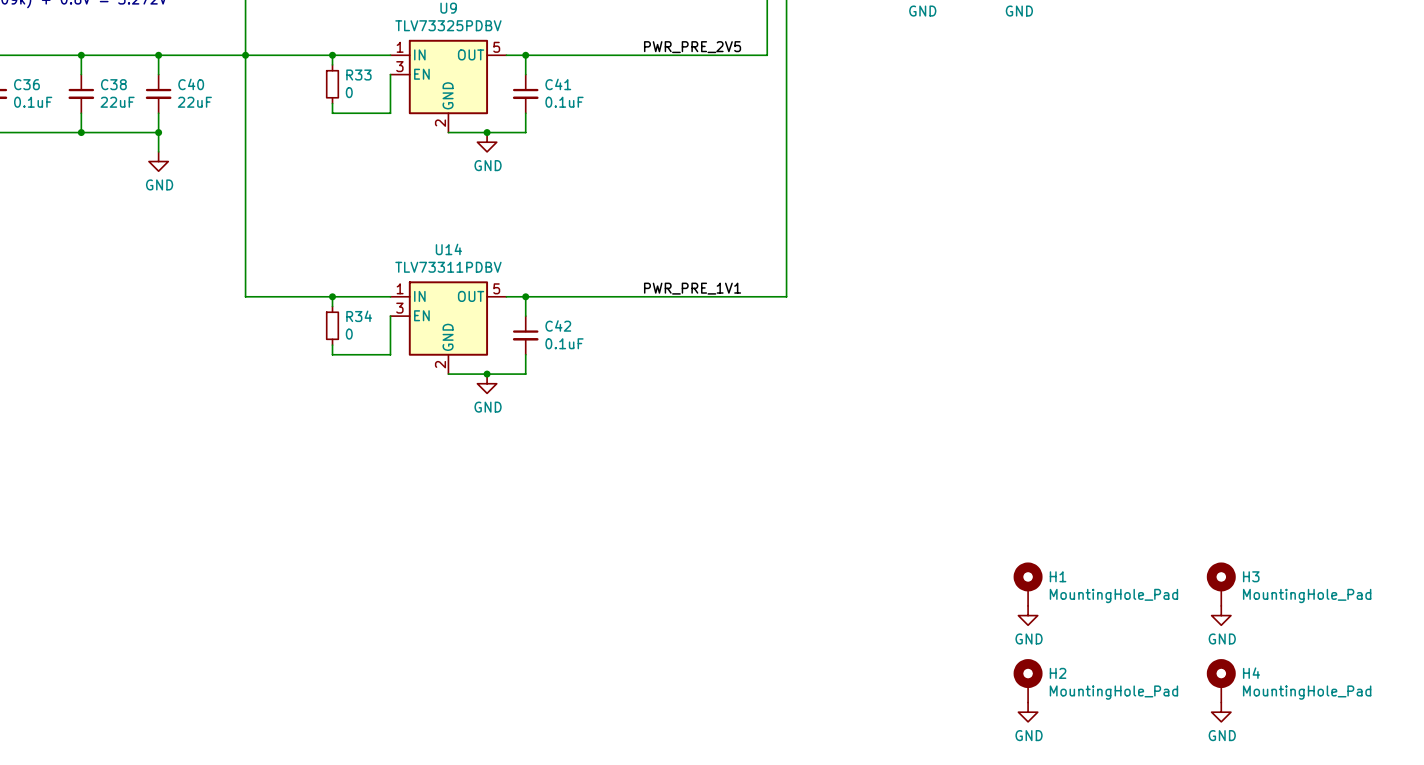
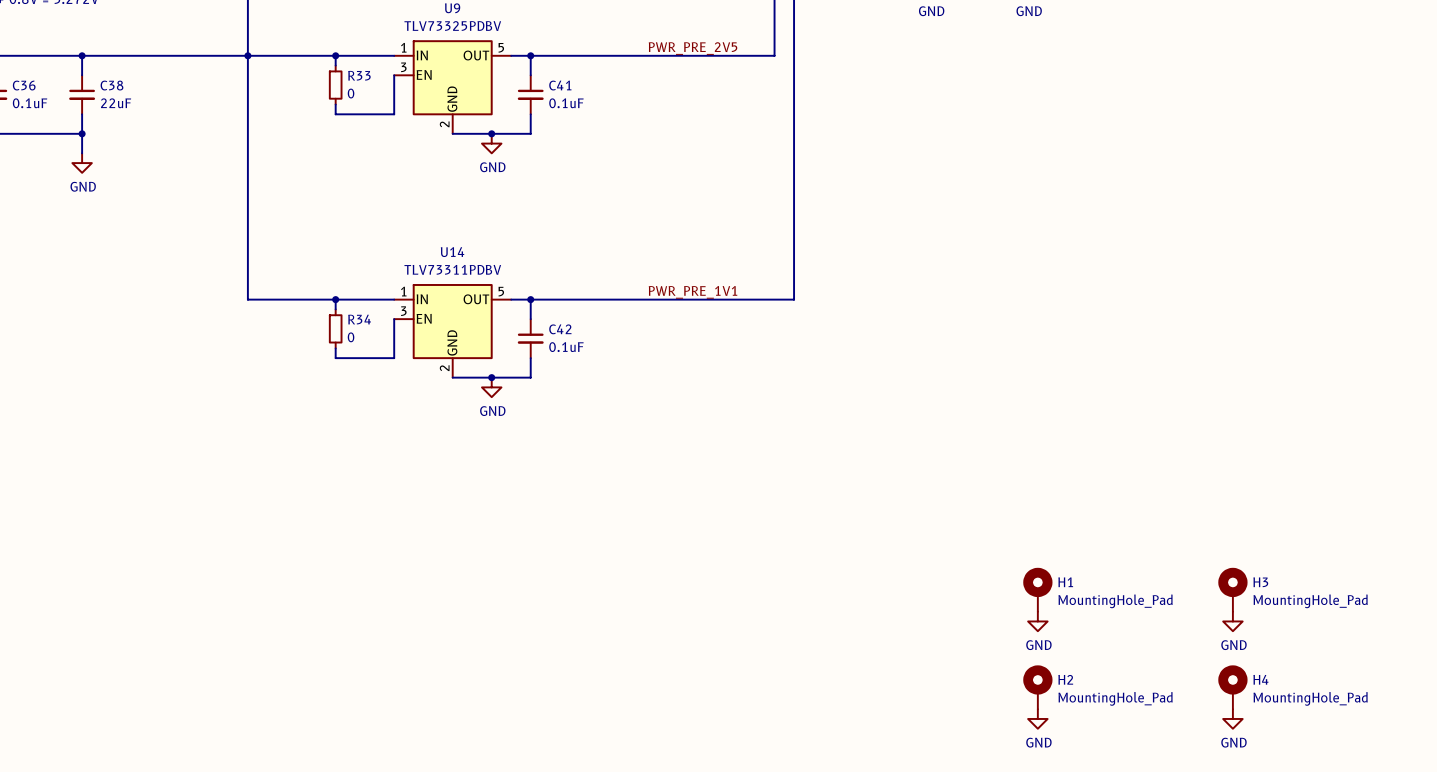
wire: (158, 55) (158, 74) -> none
junction: (158, 55) -> none
C40: 22uF (158, 93) -> none
wire: (158, 113) (158, 151) -> none
wire: (81, 132) (158, 132) -> (82, 133) (82, 153)
junction: (158, 132) -> none
power symbol position: GND (158, 161) -> GND (82, 163)

